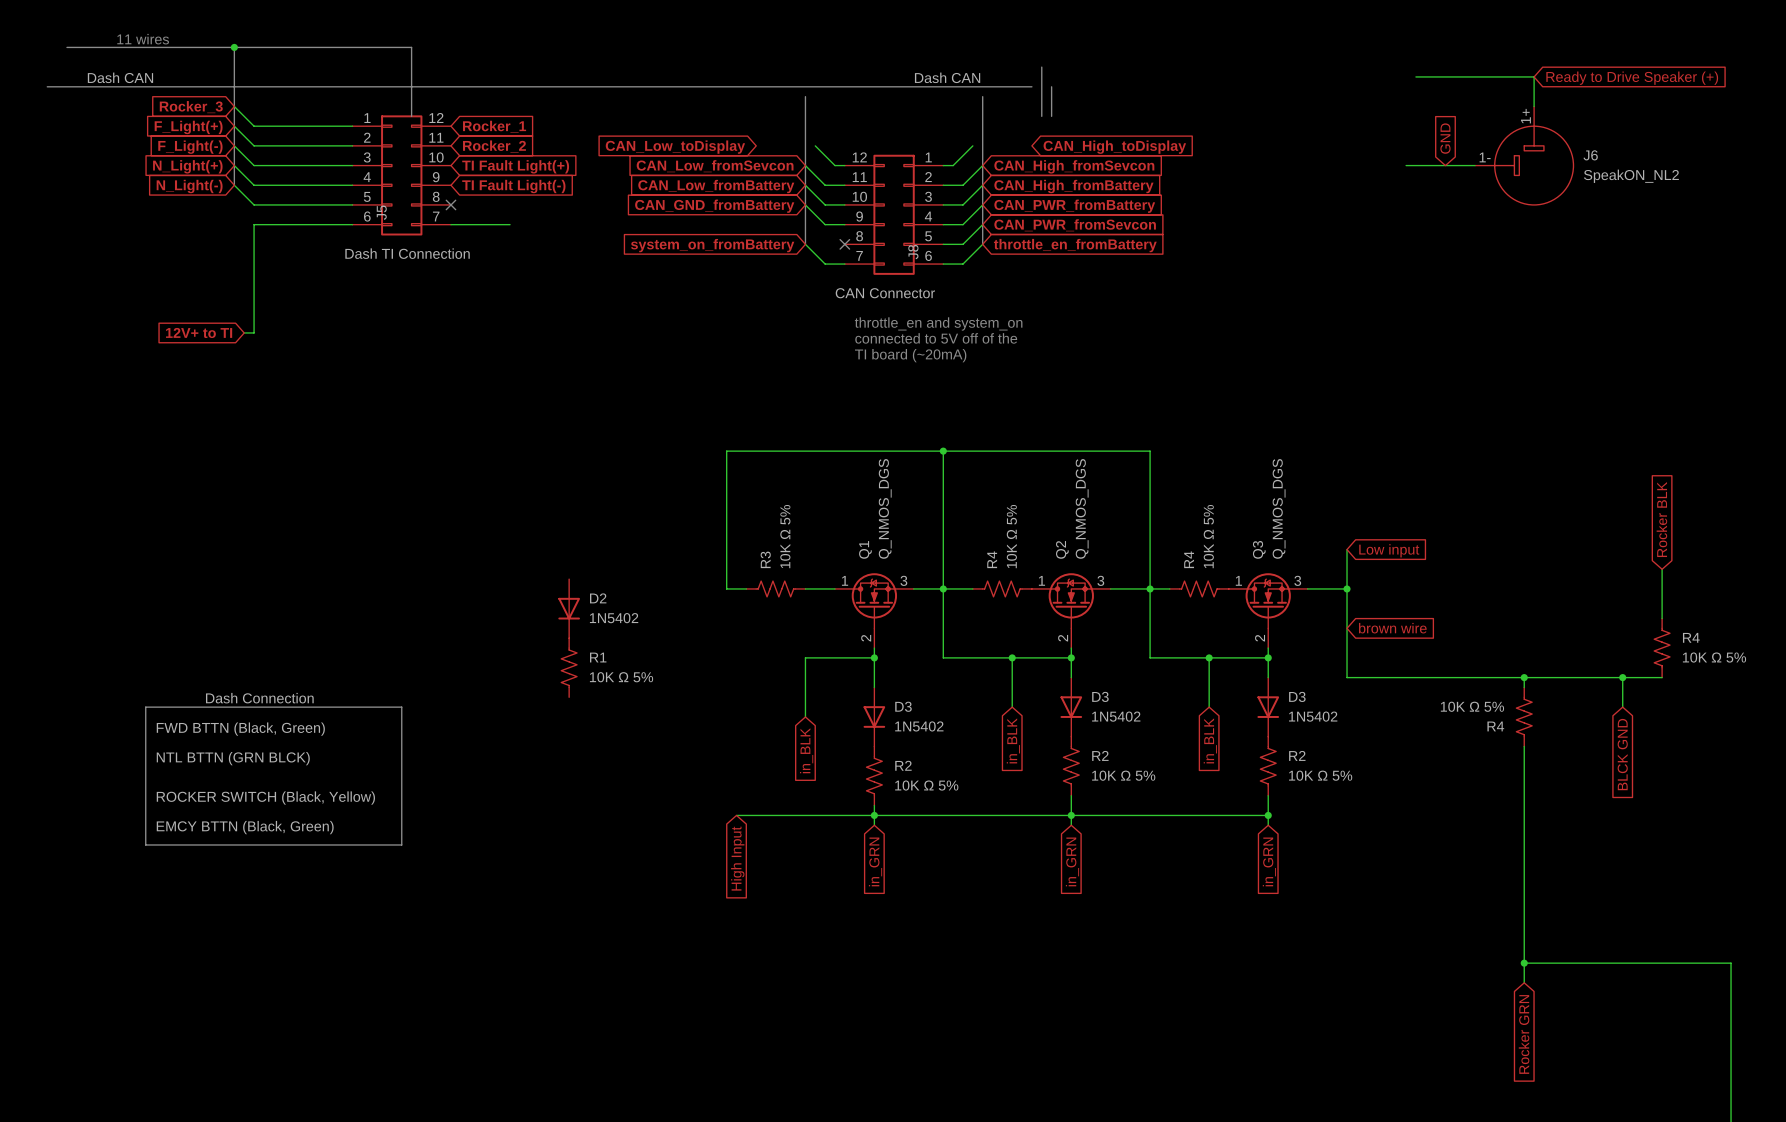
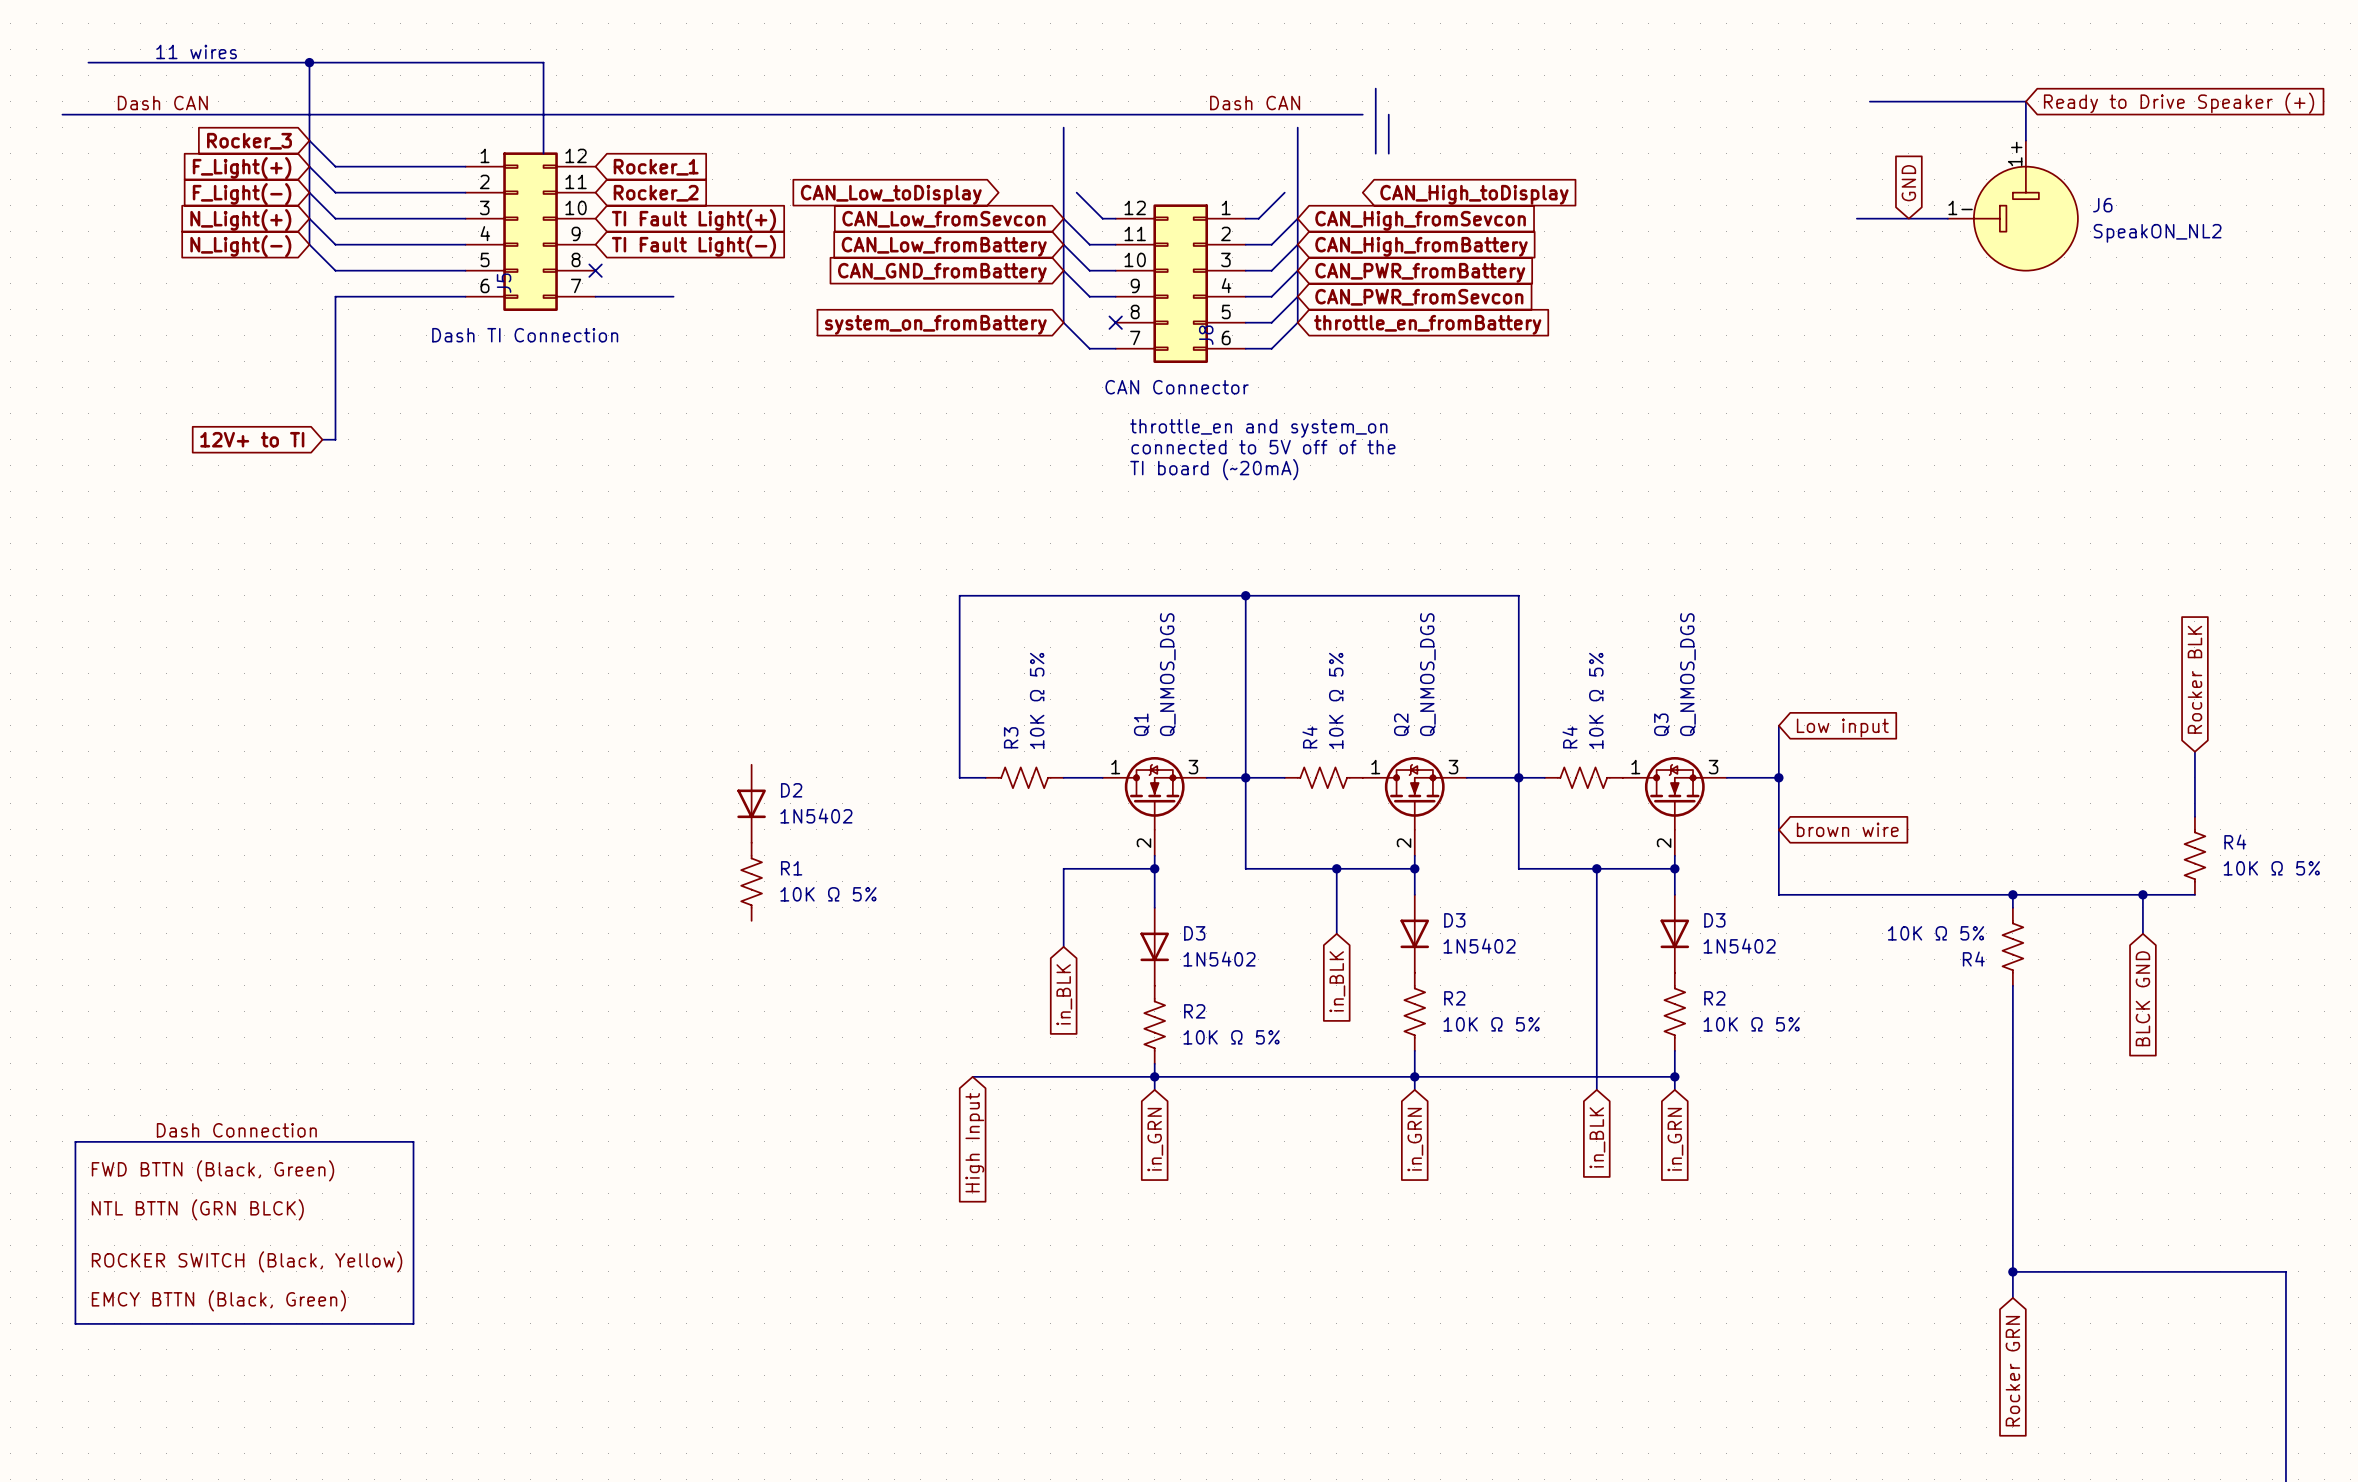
label position: Dash Connection (259, 698) -> Dash Connection (236, 1130)
bus: (145, 707) (145, 844) (401, 844) (401, 707) (145, 707) -> (75, 1141) (75, 1323) (413, 1323) (413, 1141) (75, 1141)
wire: none -> (1596, 933) (1596, 1089)
label position: FWD BTTN (Black, Green) (240, 729) -> FWD BTTN (Black, Green) (212, 1170)
global label position: in_BLK (1210, 740) -> in_BLK (1597, 1137)
label position: NTL BTTN (GRN BLCK) (233, 758) -> NTL BTTN (GRN BLCK) (197, 1209)
label position: ROCKER SWITCH (Black, Yellow) (265, 798) -> ROCKER SWITCH (Black, Yellow) (247, 1261)
label position: EMCY BTTN (Black, Green) (245, 827) -> EMCY BTTN (Black, Green) (218, 1300)

